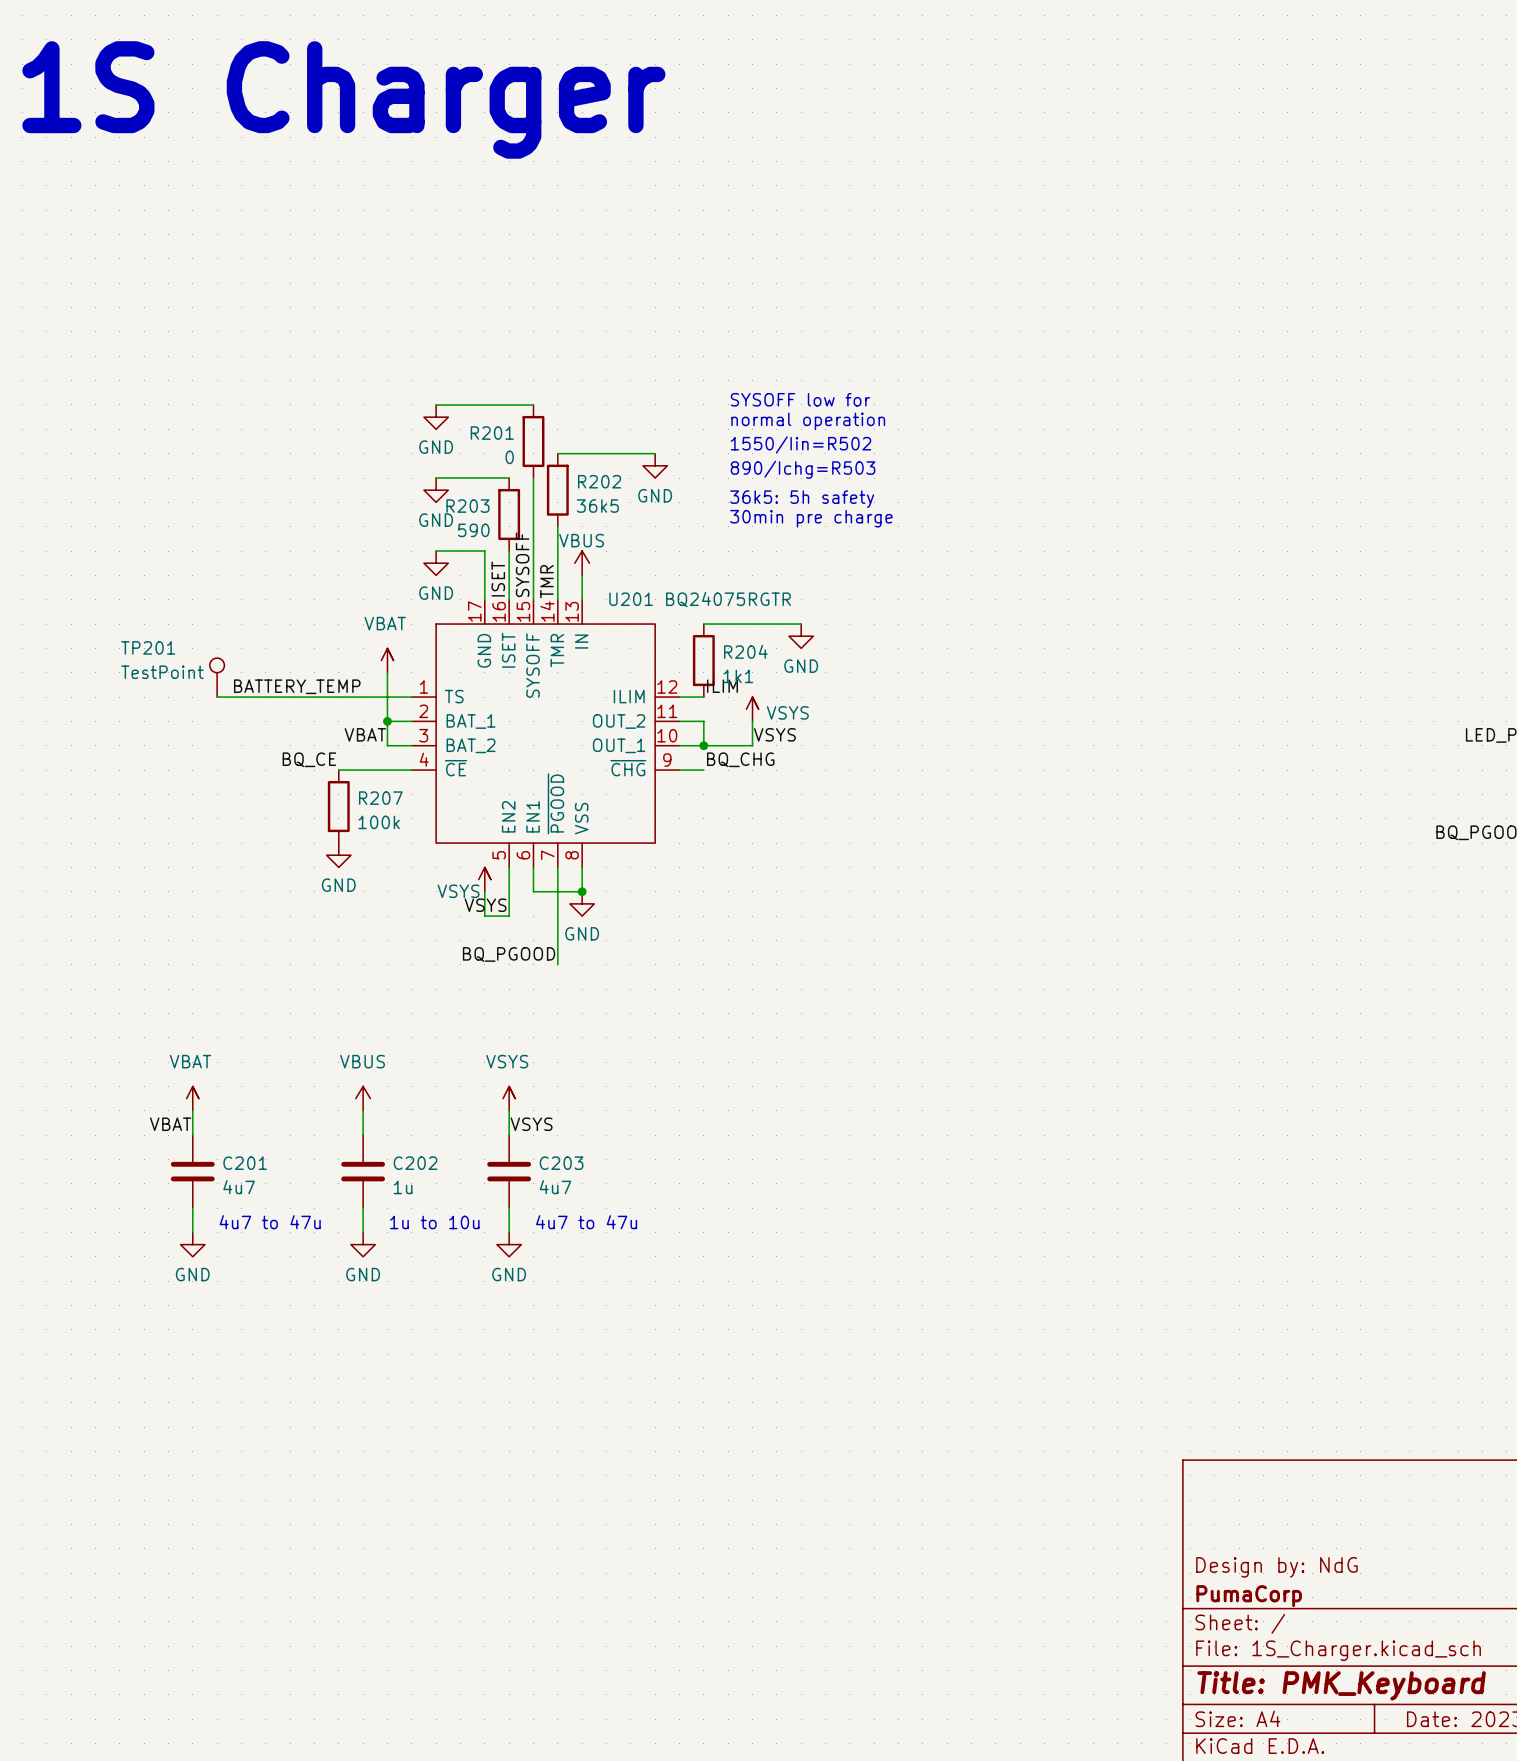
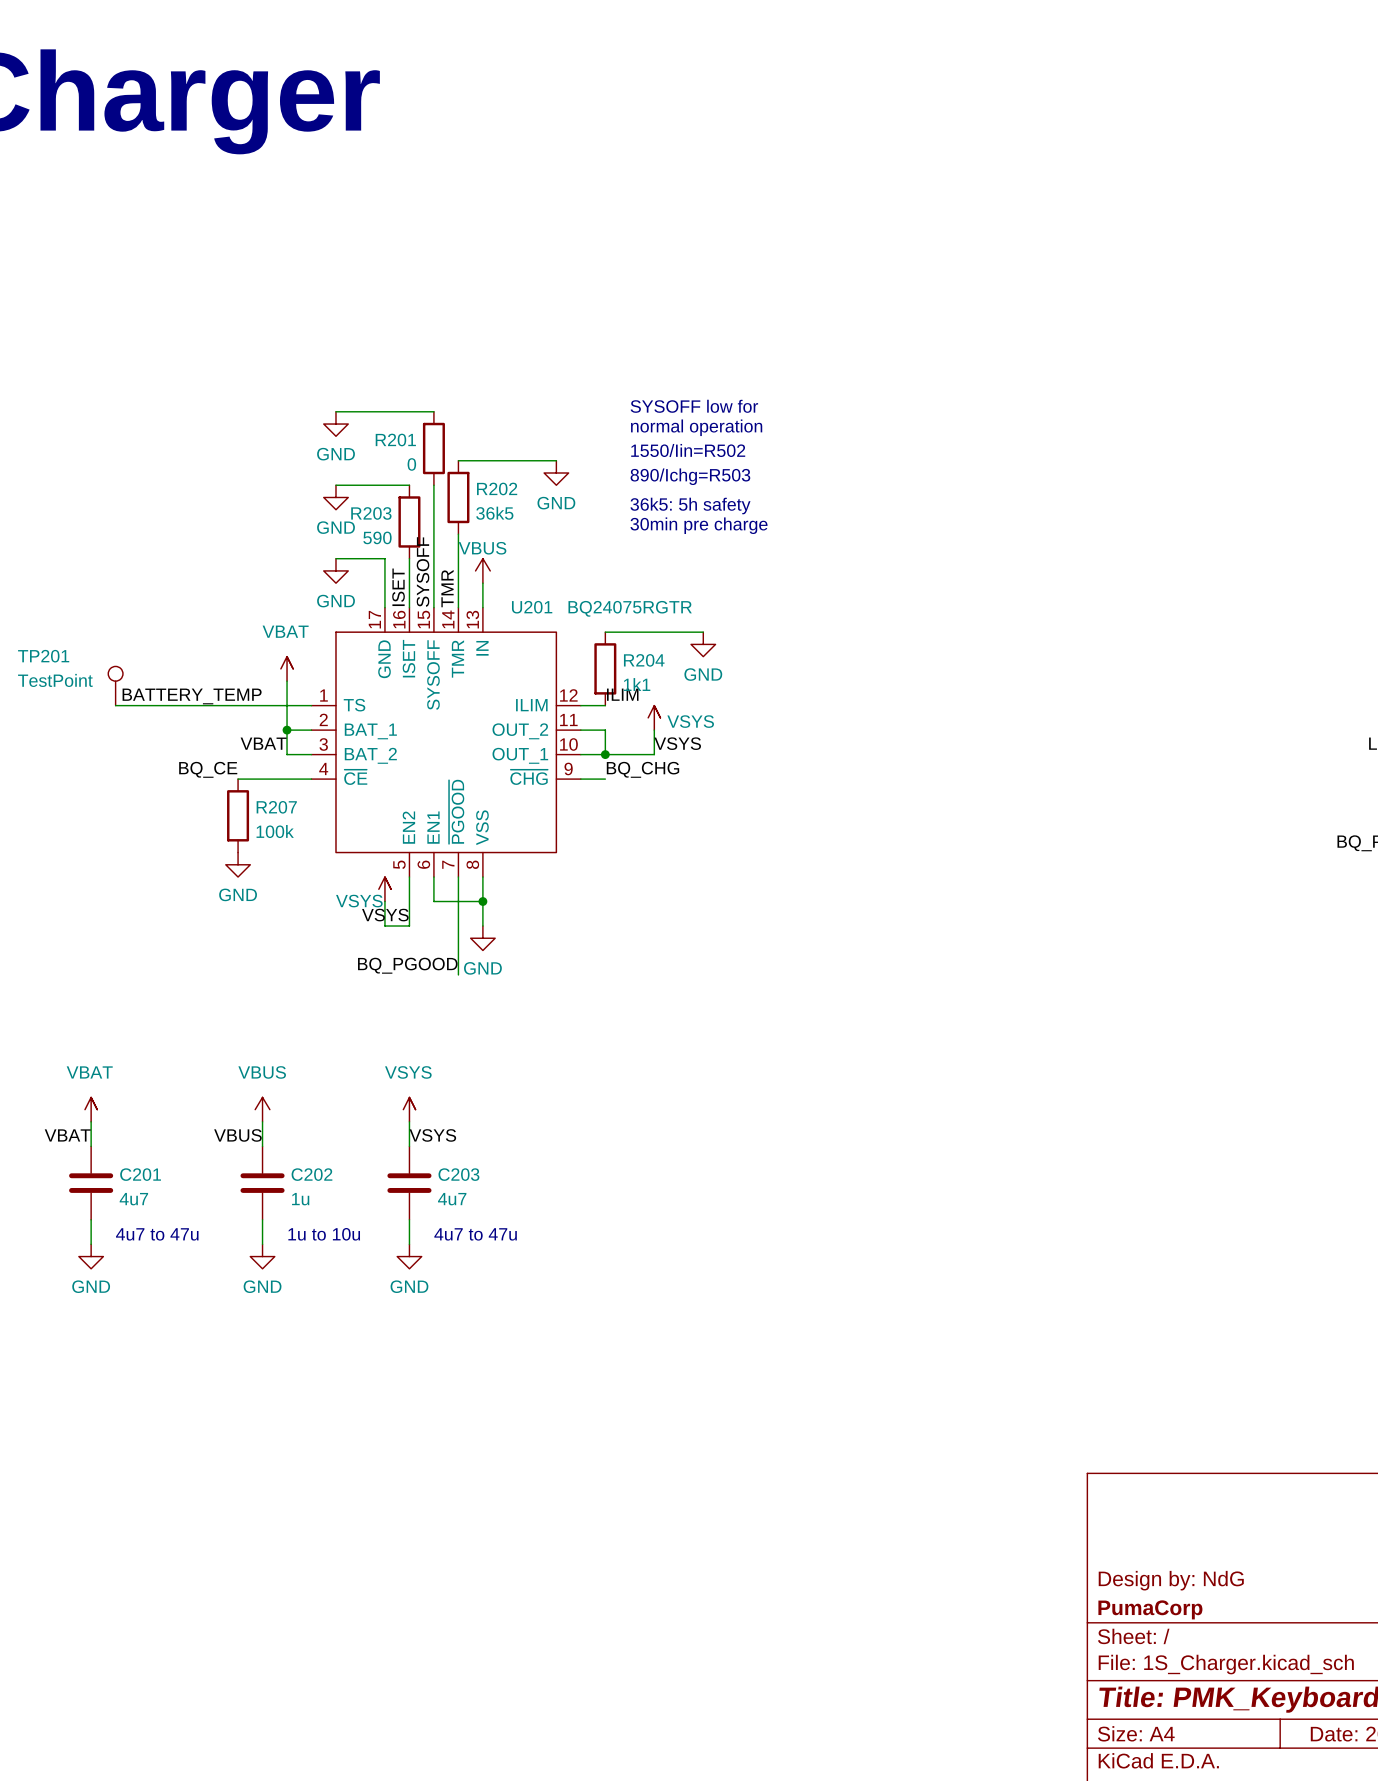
power symbol position: GND (582, 903) -> GND (482, 938)
label: none -> VBUS (237, 1135)

